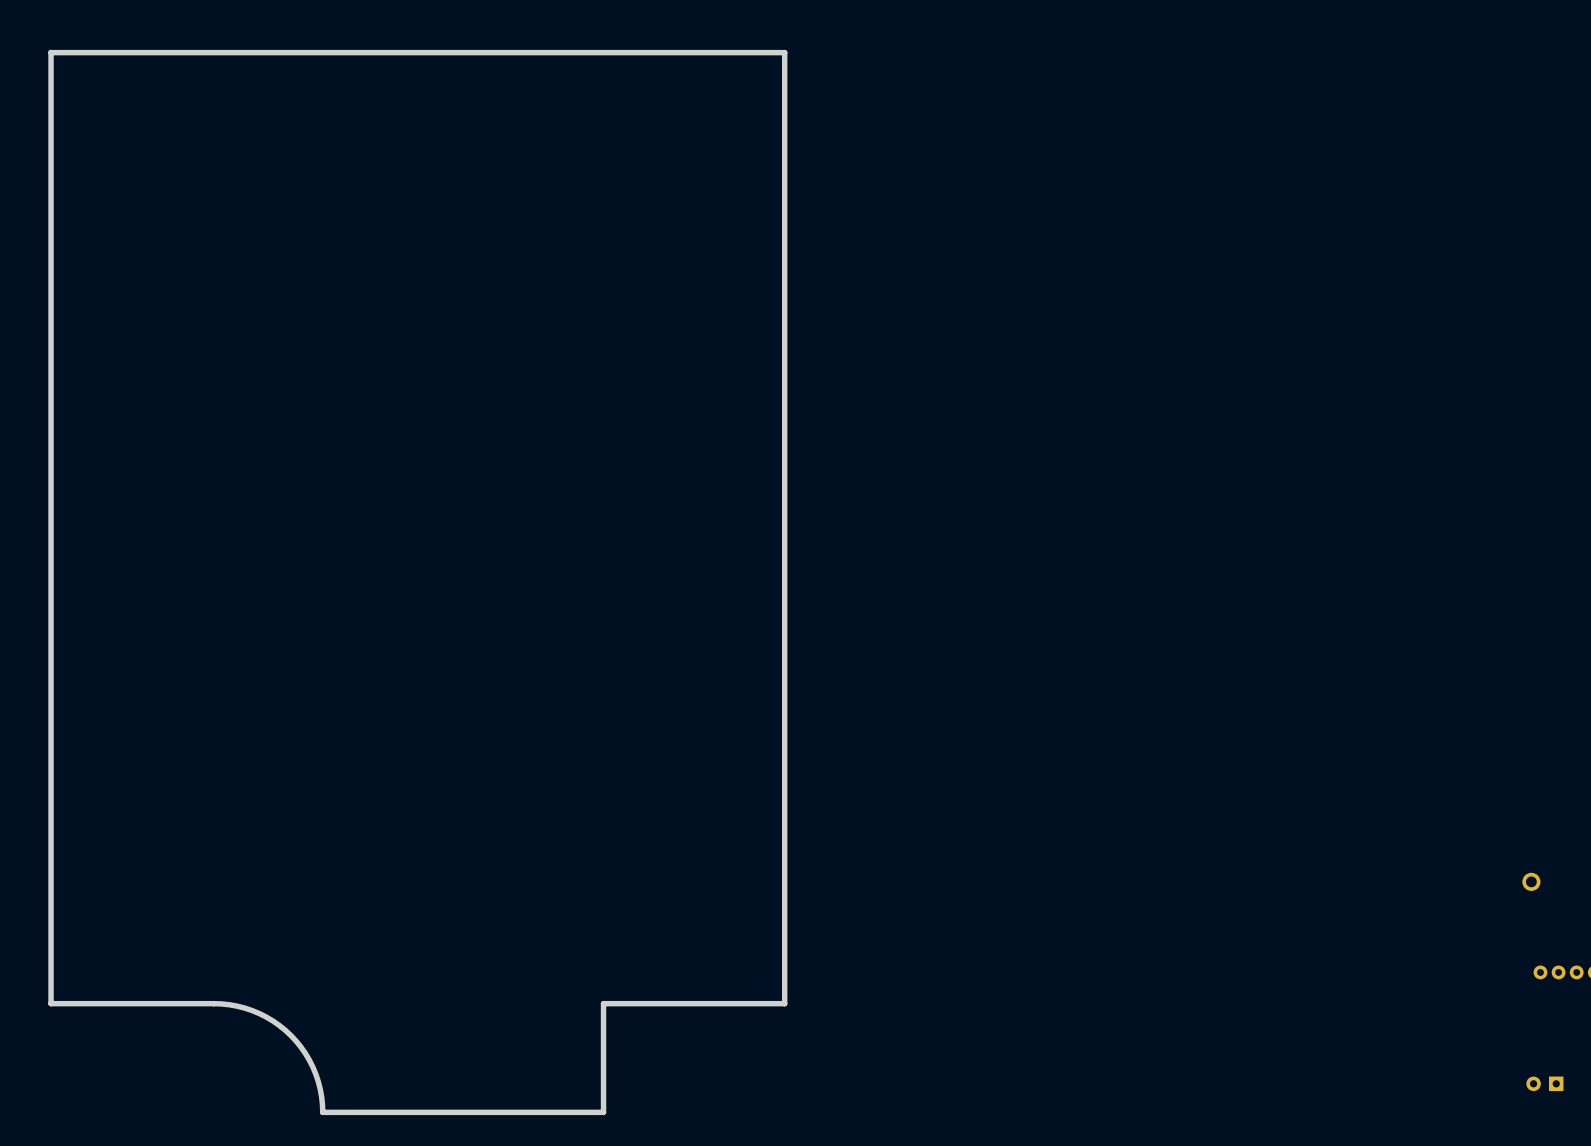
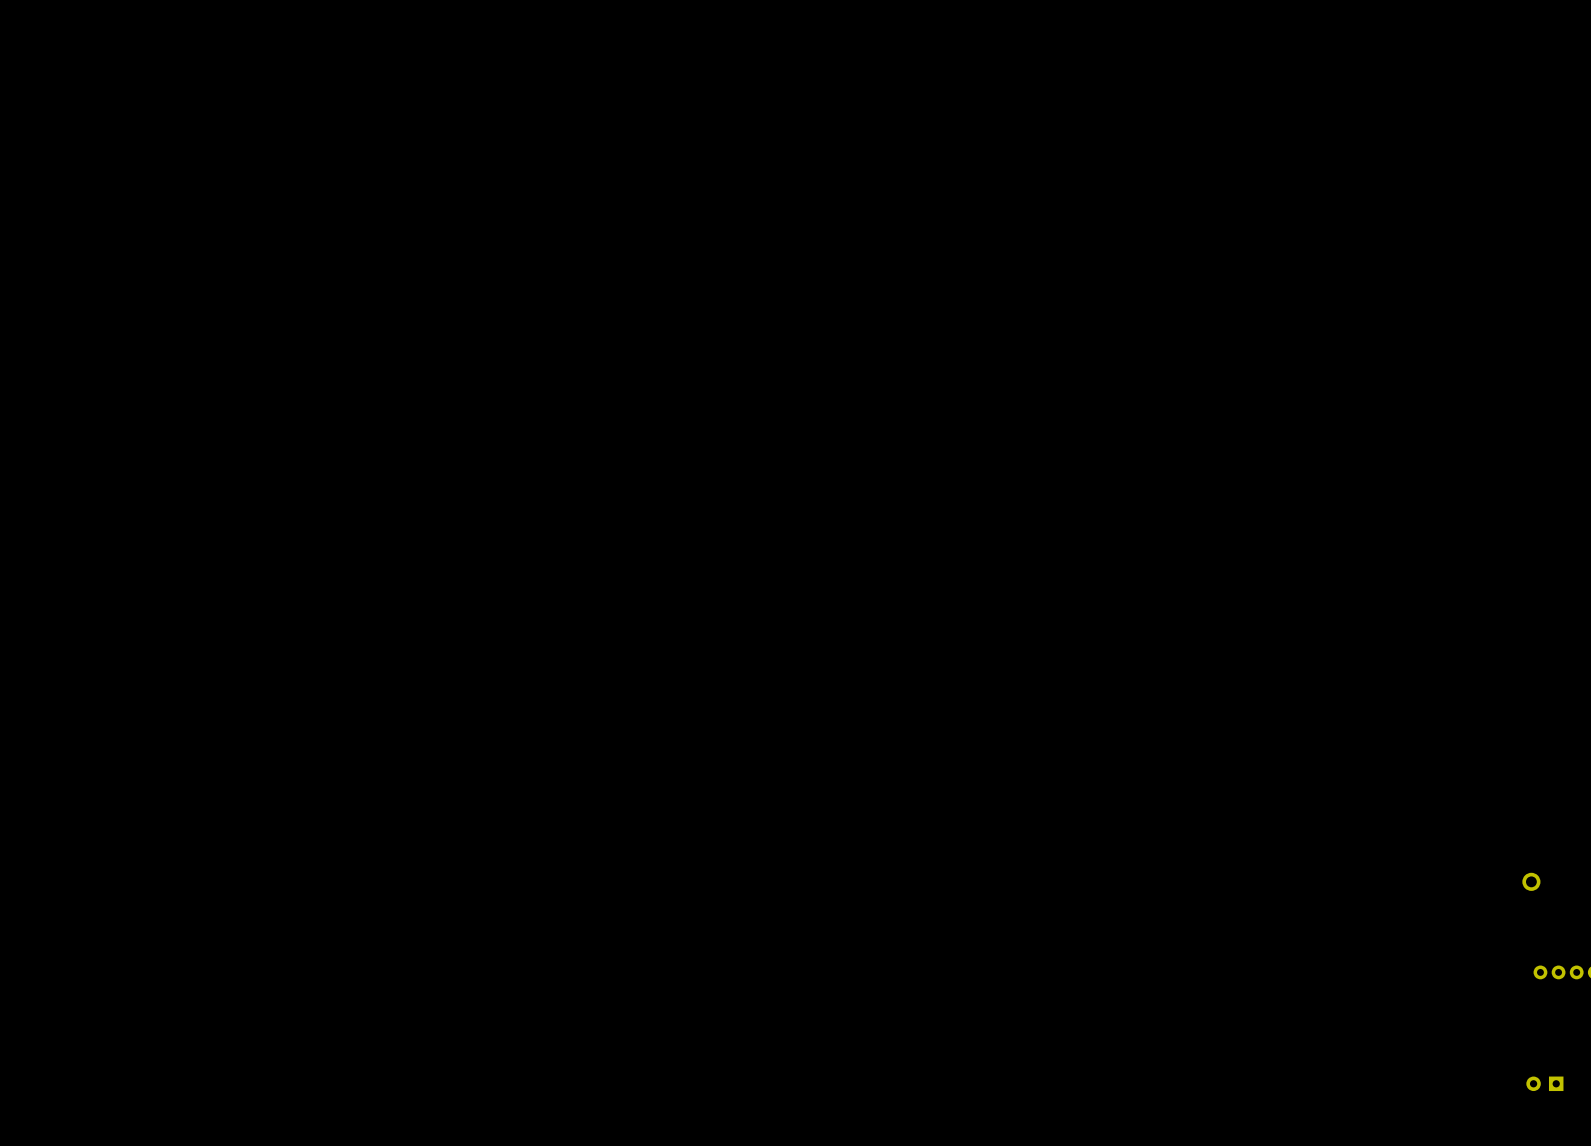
board edge: (784, 52) (51, 52) (51, 1003) (214, 1003) (229, 1004) (252, 1010) (279, 1025) (301, 1047) (315, 1074) (321, 1096) (322, 1112) (603, 1112) (603, 1003) (784, 1003) (784, 52) -> none

